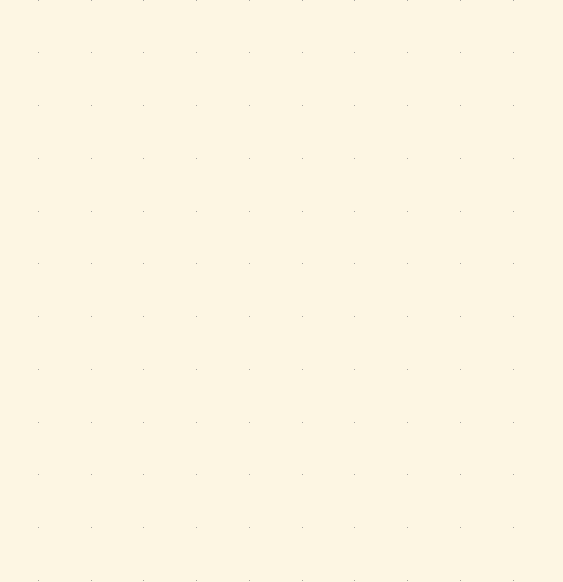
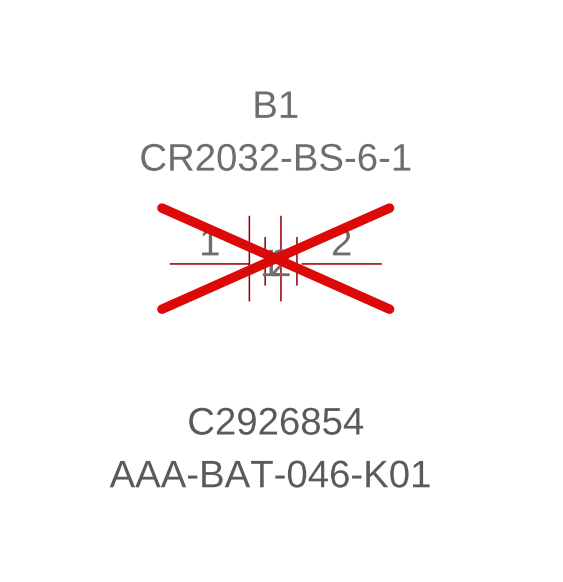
B1: none -> CR2032-BS-6-1 (275, 258)
text: none -> C2926854 (276, 421)
text: none -> AAA-BAT-046-K01 (269, 474)

